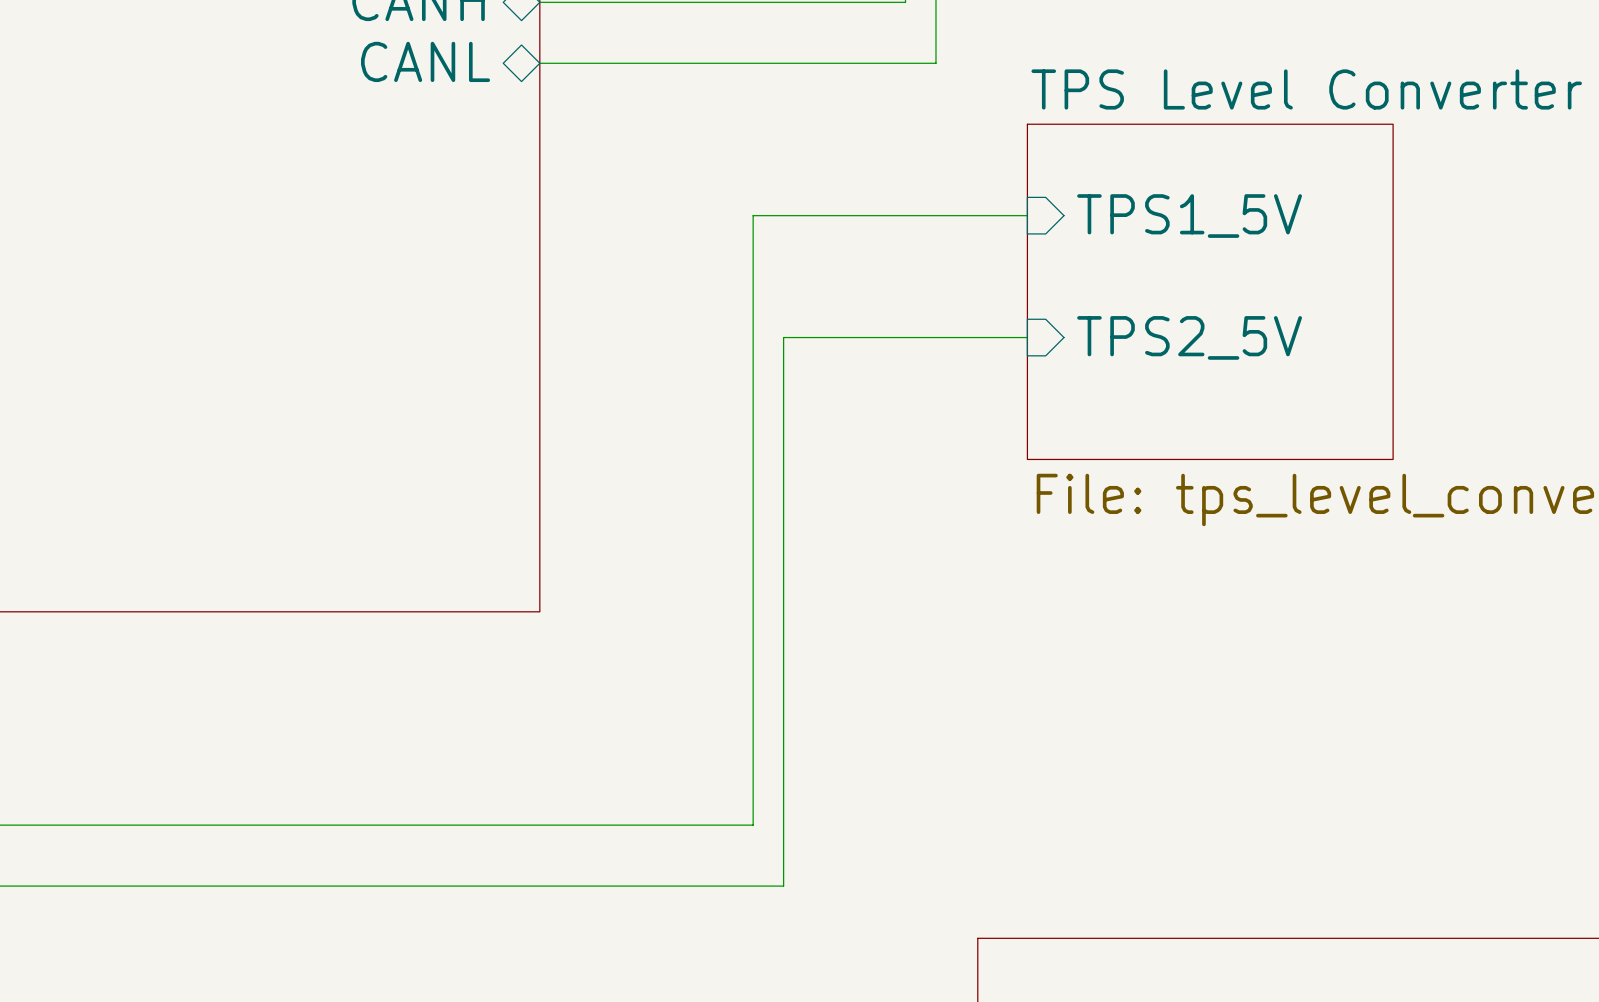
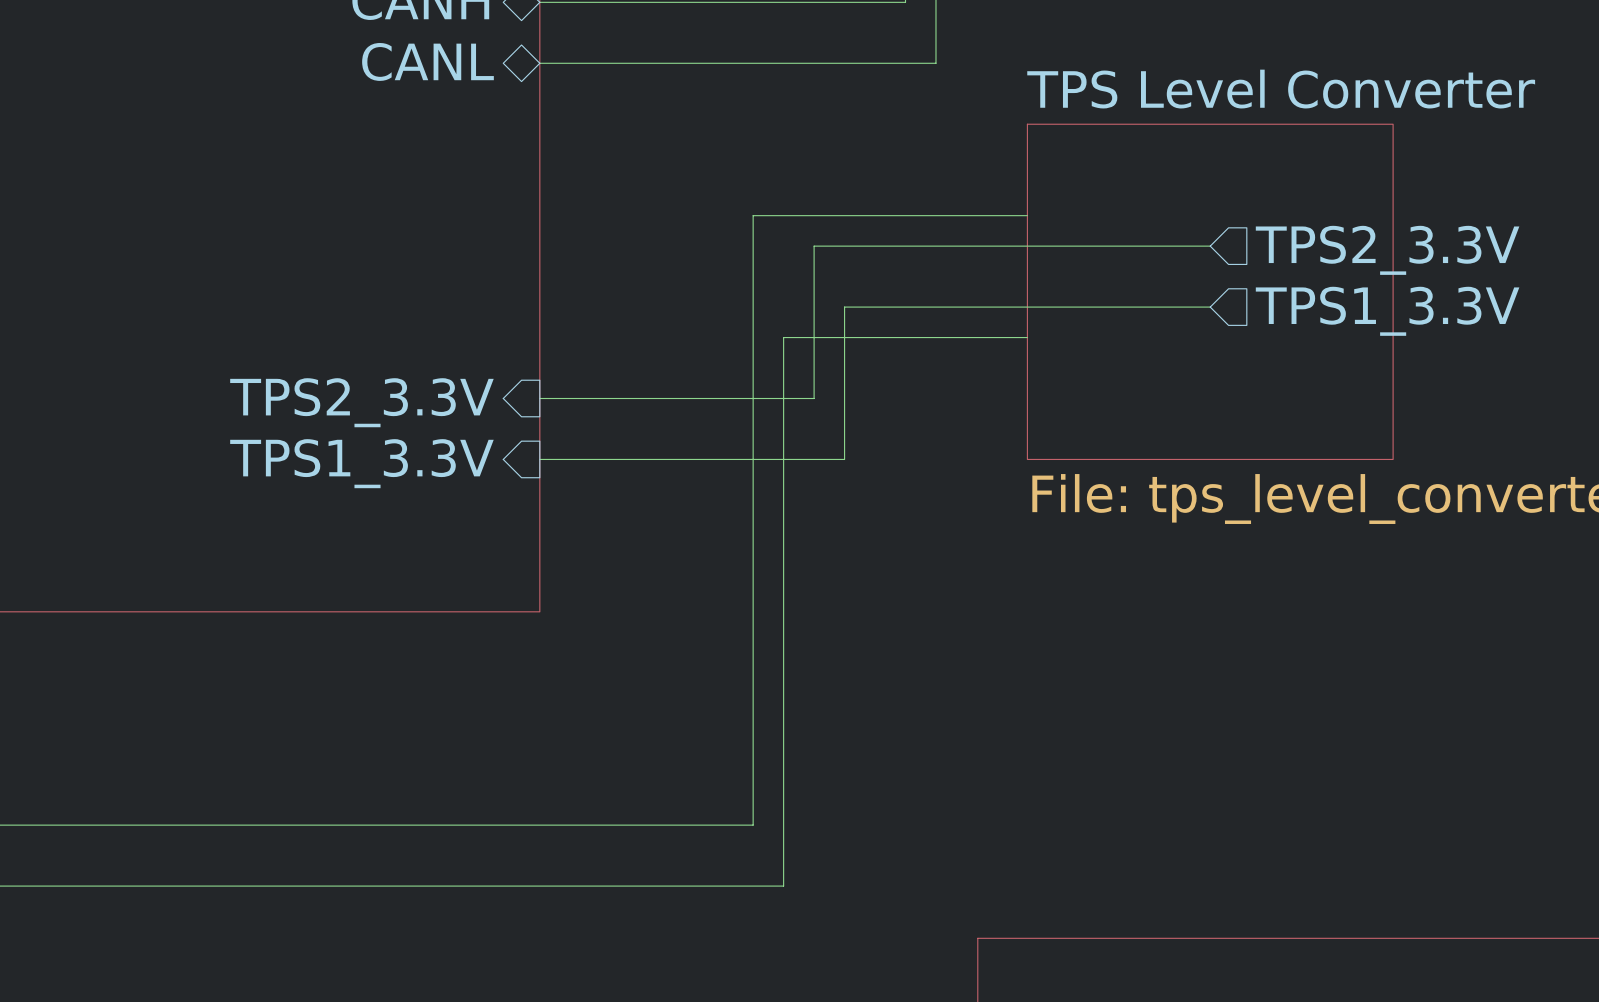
sheet pin shape: input (1189, 216) -> output (1387, 250)
sheet pin: TPS1_5V (1189, 216) -> TPS2_3.3V (1387, 250)
wire: none -> (1210, 246) (814, 246) (814, 398) (539, 398)
wire: none -> (1210, 307) (844, 307) (844, 459) (539, 459)
sheet pin shape: input (1189, 337) -> output (1387, 311)
sheet pin: TPS2_5V (1189, 337) -> TPS1_3.3V (1387, 311)
sheet pin: none -> TPS2_3.3V (361, 402)
sheet pin: none -> TPS1_3.3V (361, 463)

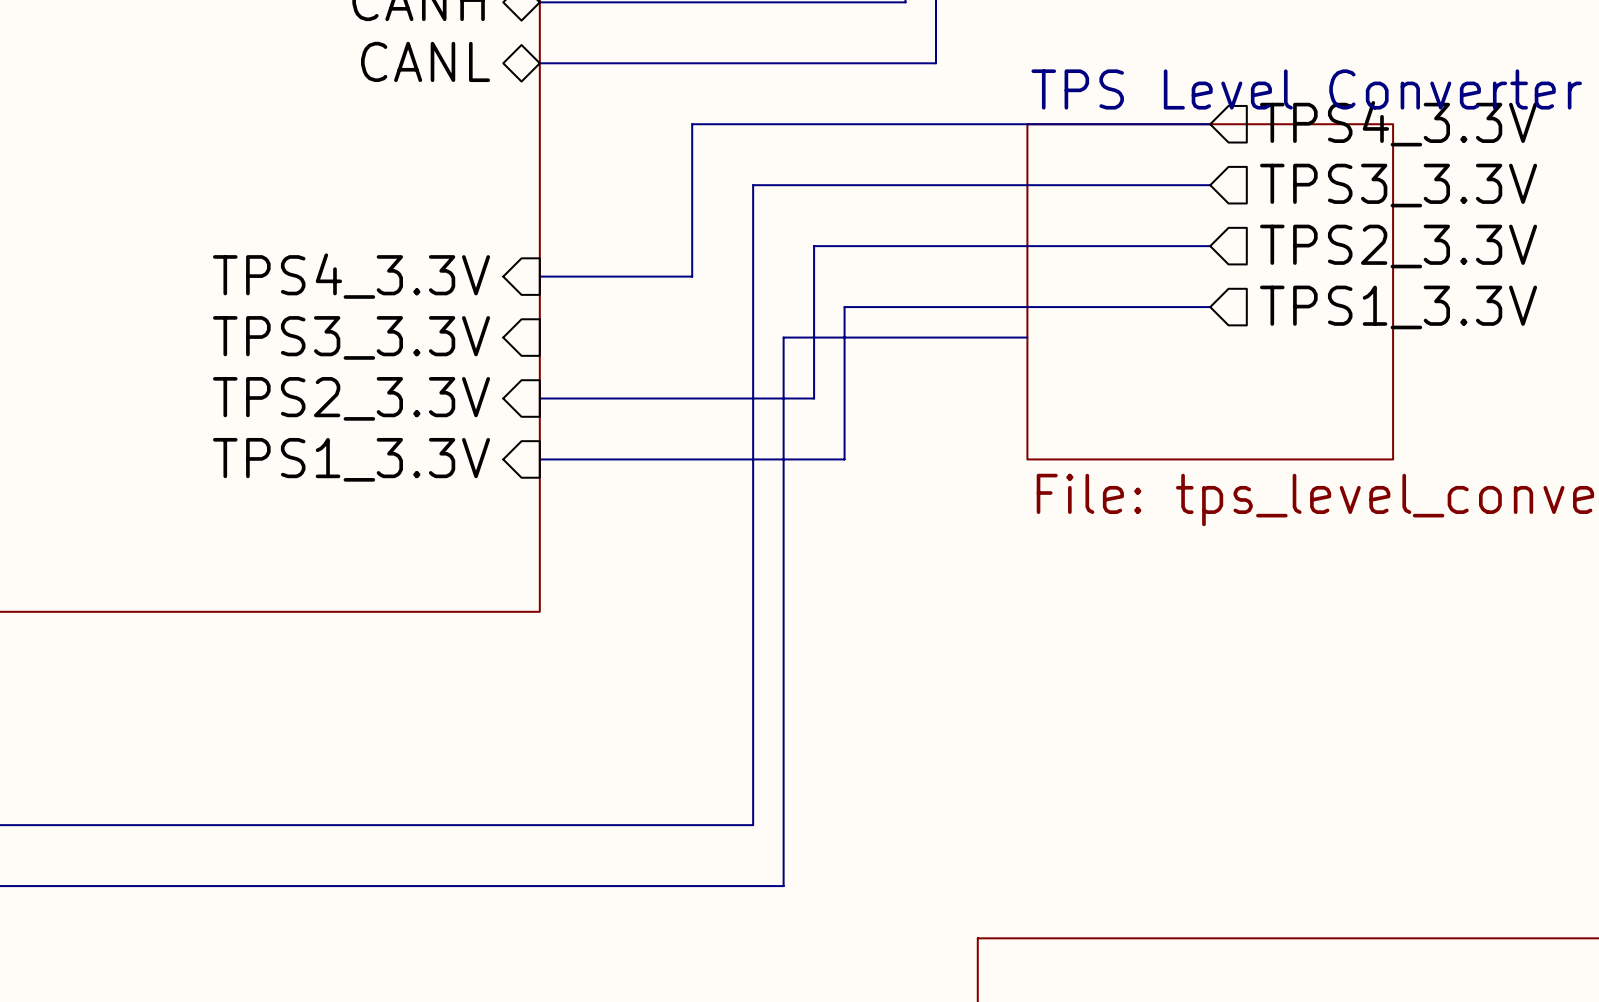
wire: none -> (1210, 124) (692, 124) (692, 276) (539, 276)
sheet pin: none -> TPS4_3.3V (1398, 123)
sheet pin: none -> TPS3_3.3V (1398, 185)
wire: (753, 215) (1027, 215) -> (753, 215) (753, 185) (1210, 185)
sheet pin: none -> TPS4_3.3V (351, 276)
sheet pin: none -> TPS3_3.3V (351, 337)

